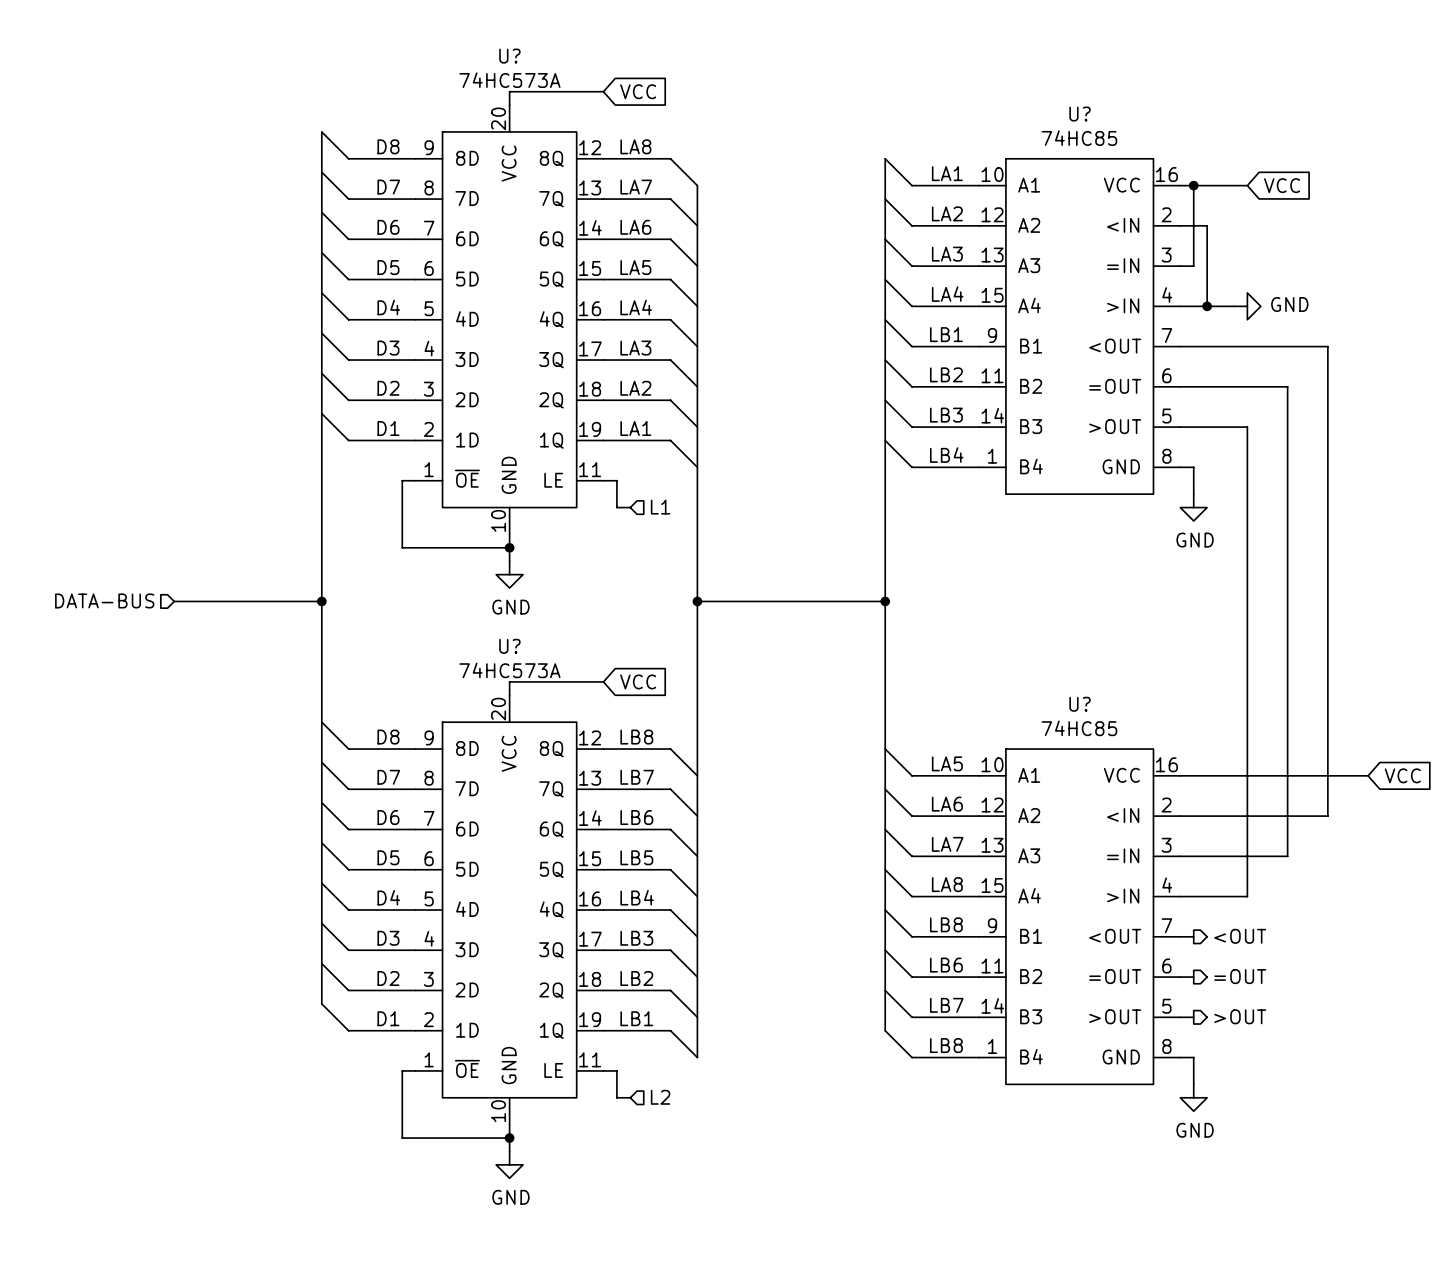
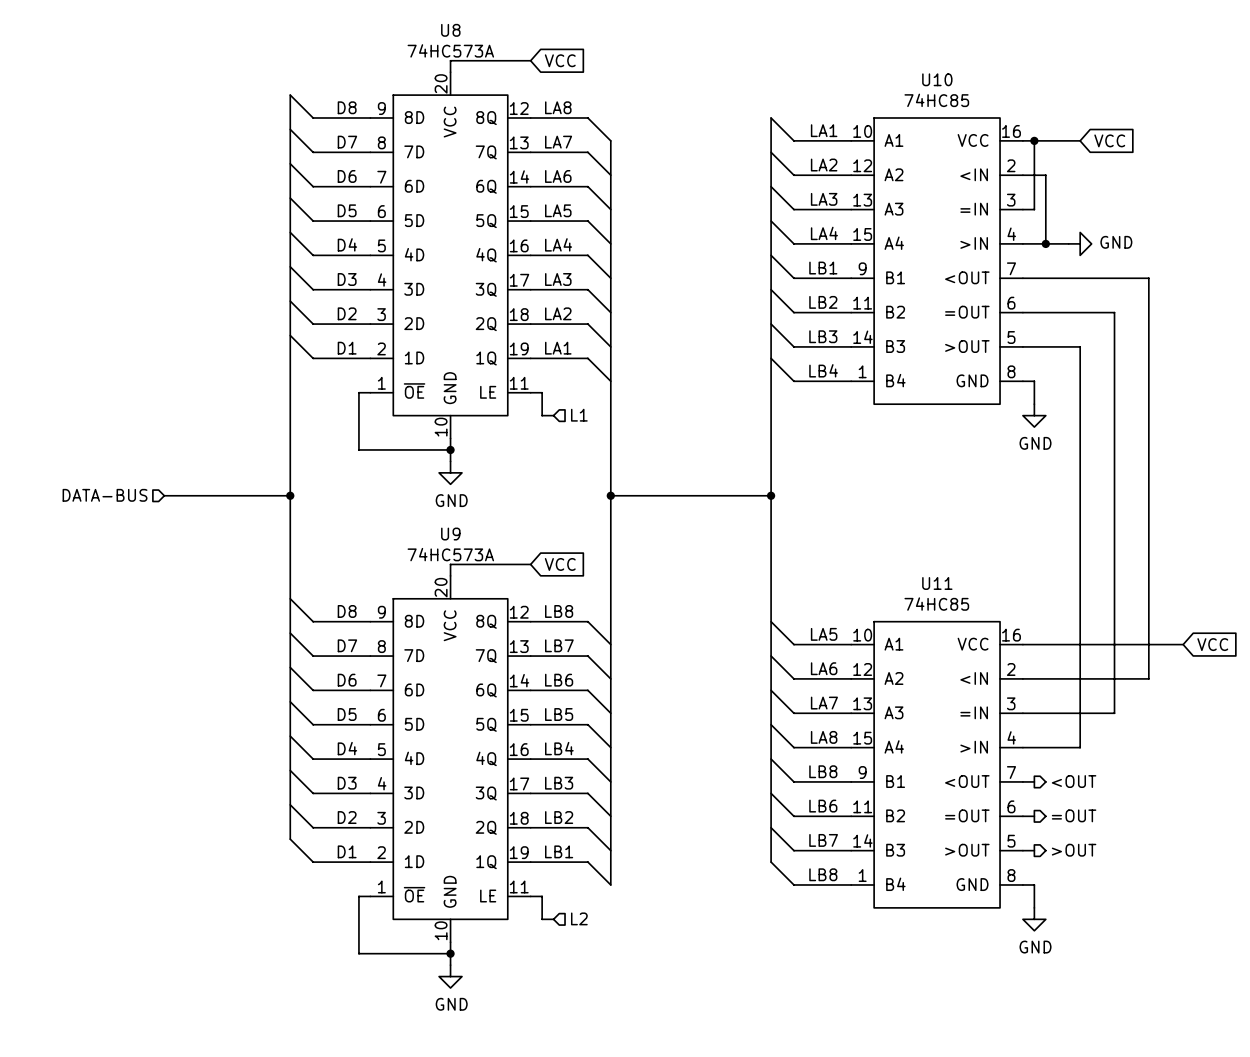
U? name: U? (509, 56) -> U8 (450, 30)
U? name: U? (1080, 114) -> U10 (937, 79)
U? name: U? (509, 646) -> U9 (450, 534)
U? name: U? (1080, 704) -> U11 (937, 583)

